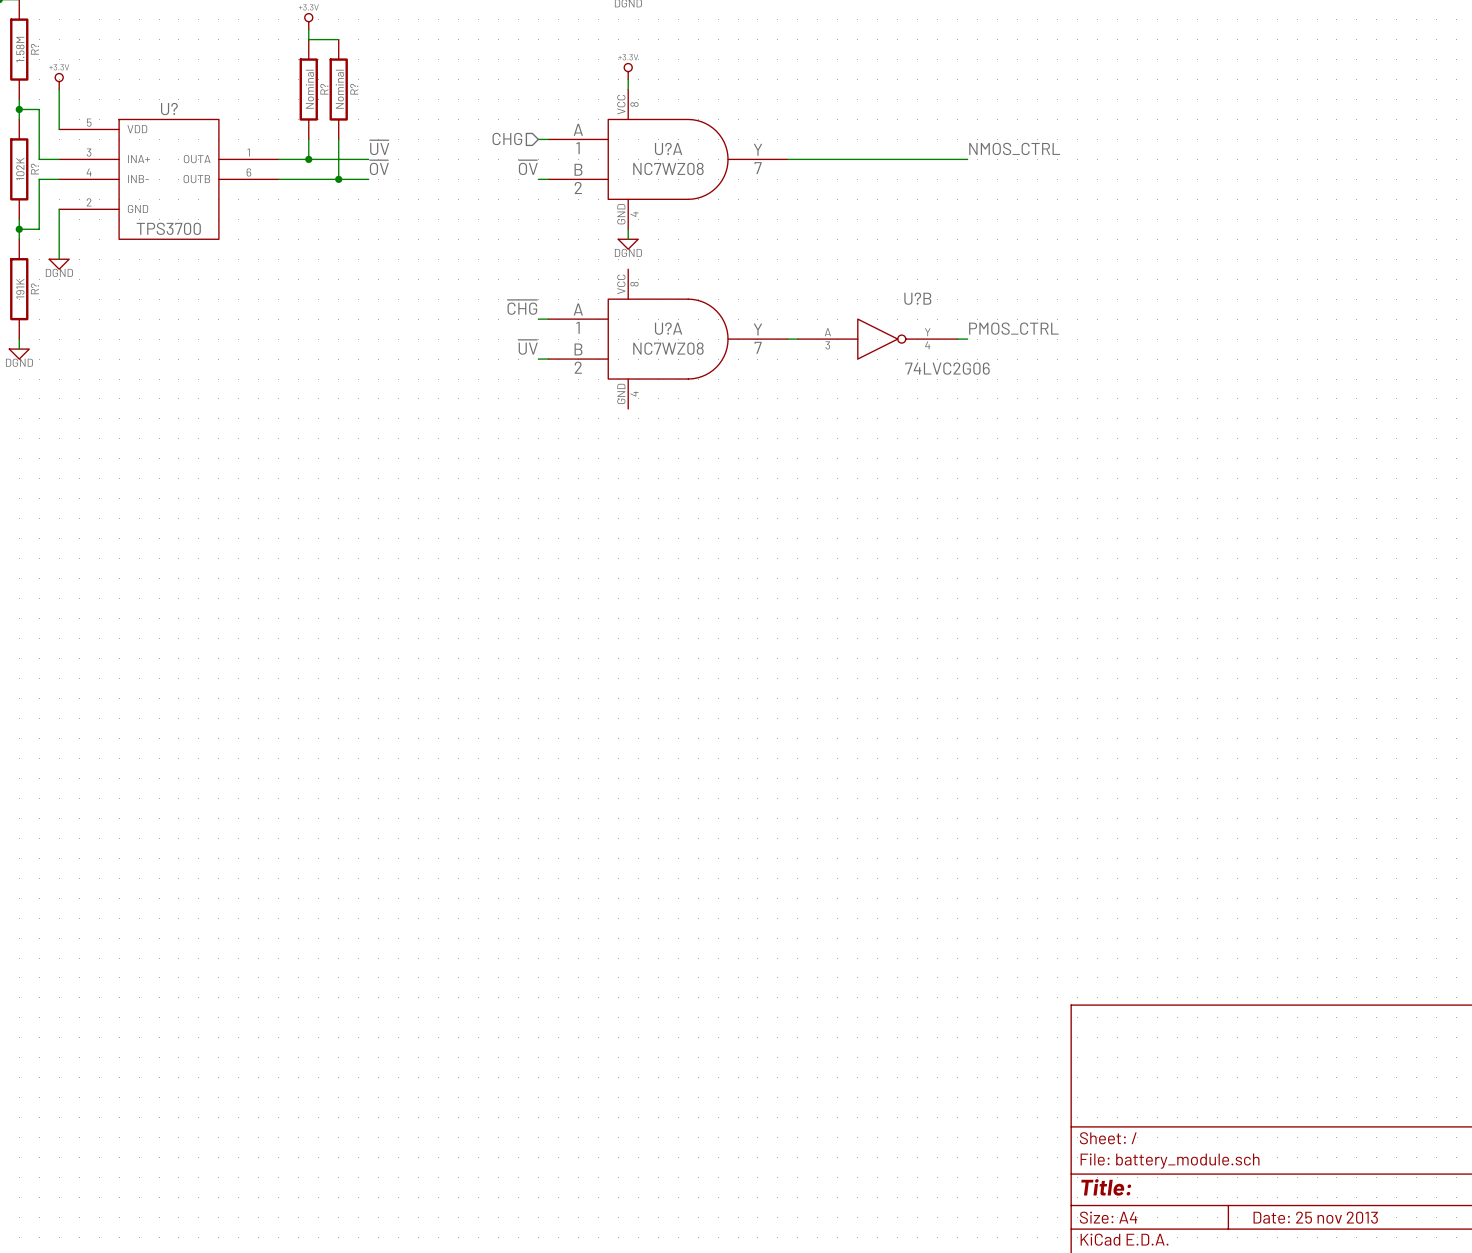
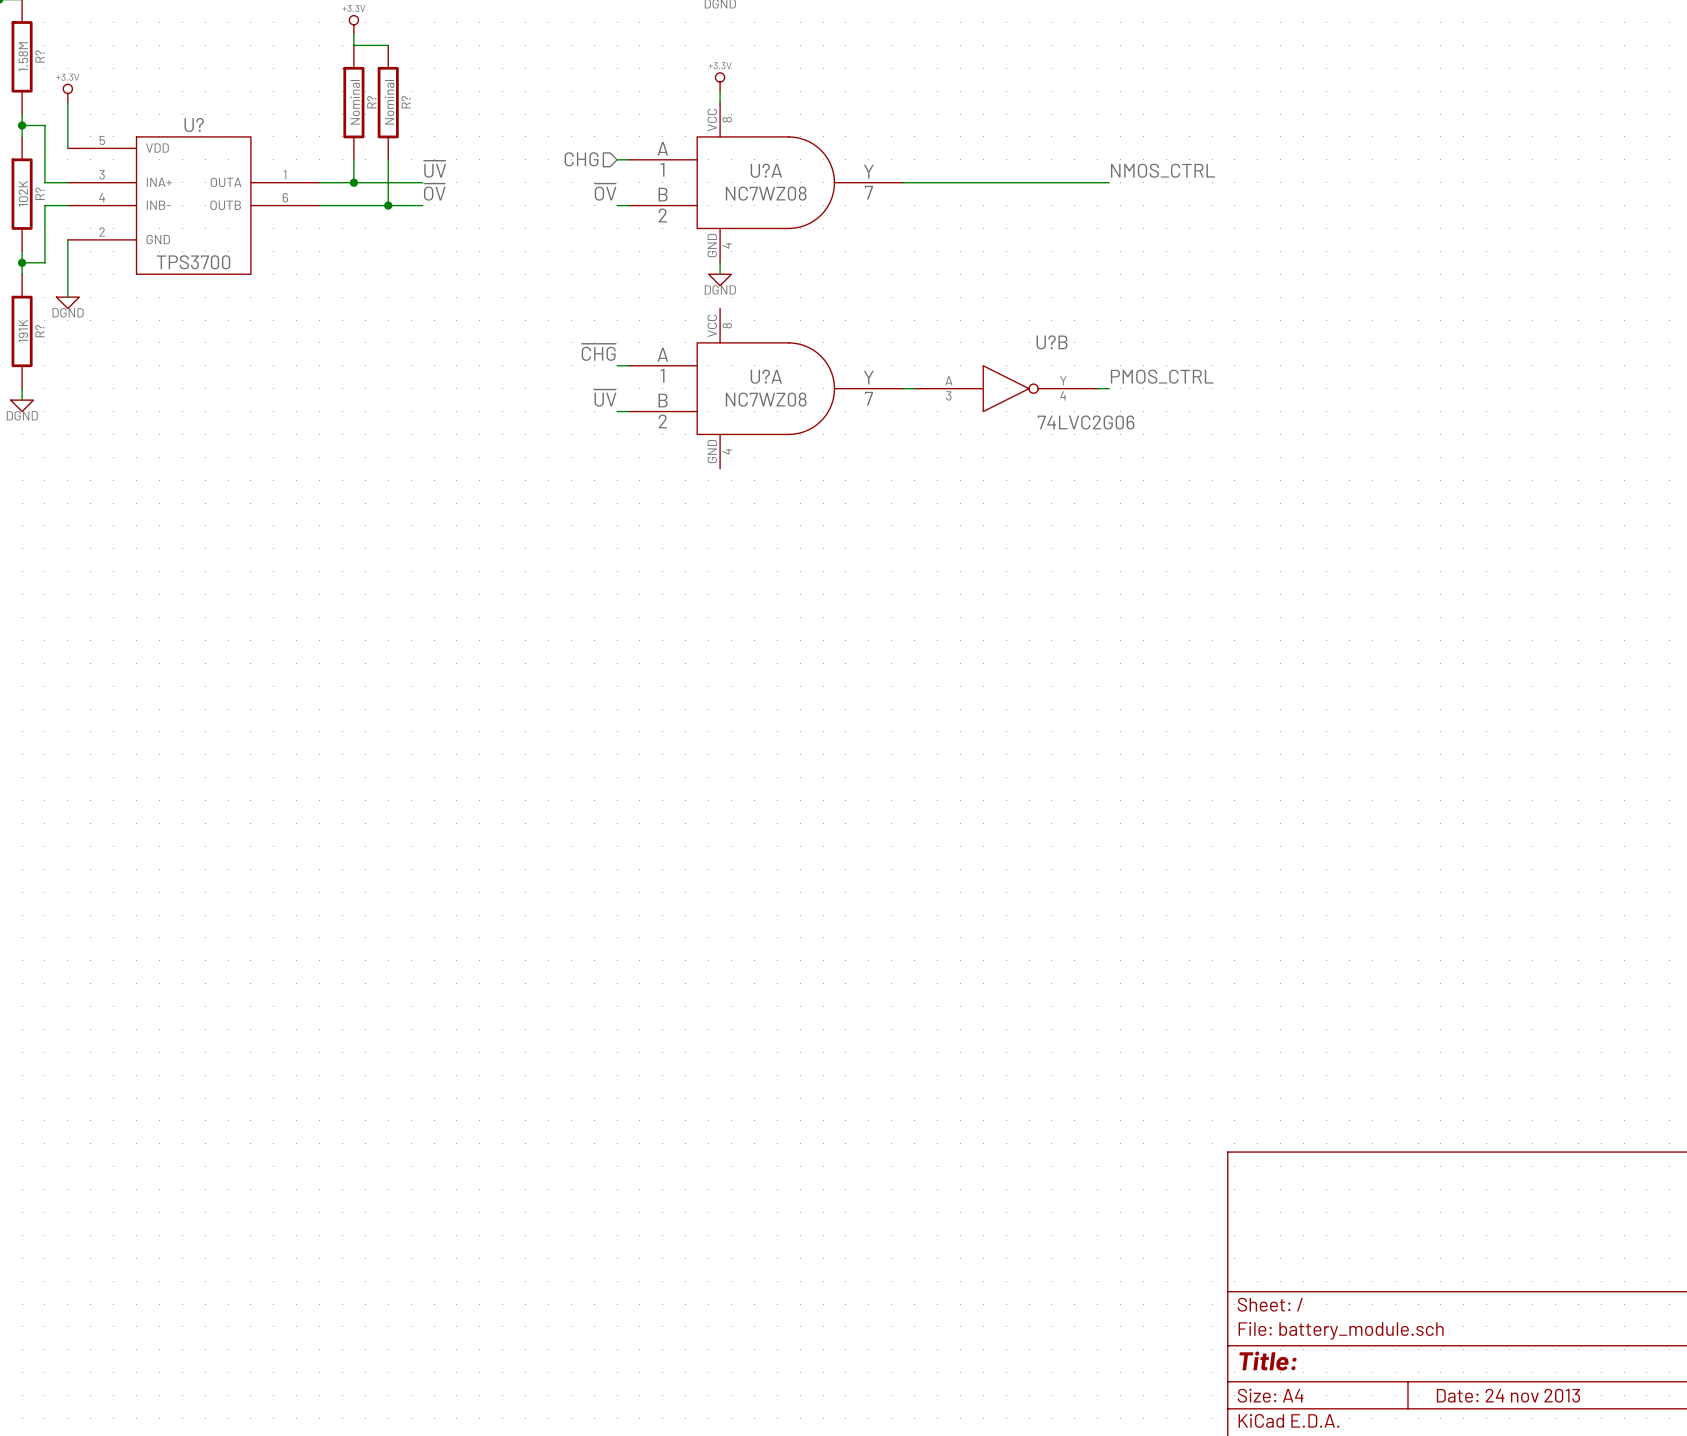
title block: Date: 25 nov 2013 (1315, 1217) -> Date: 24 nov 2013 (1508, 1395)

